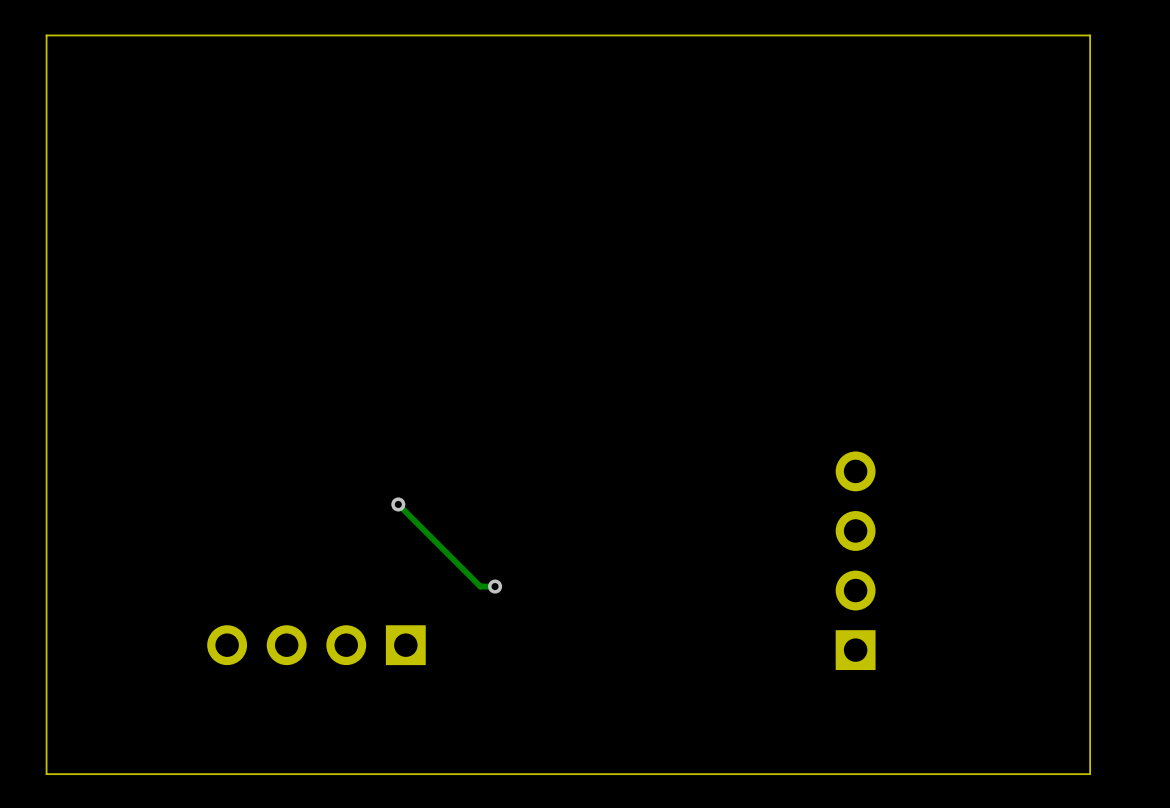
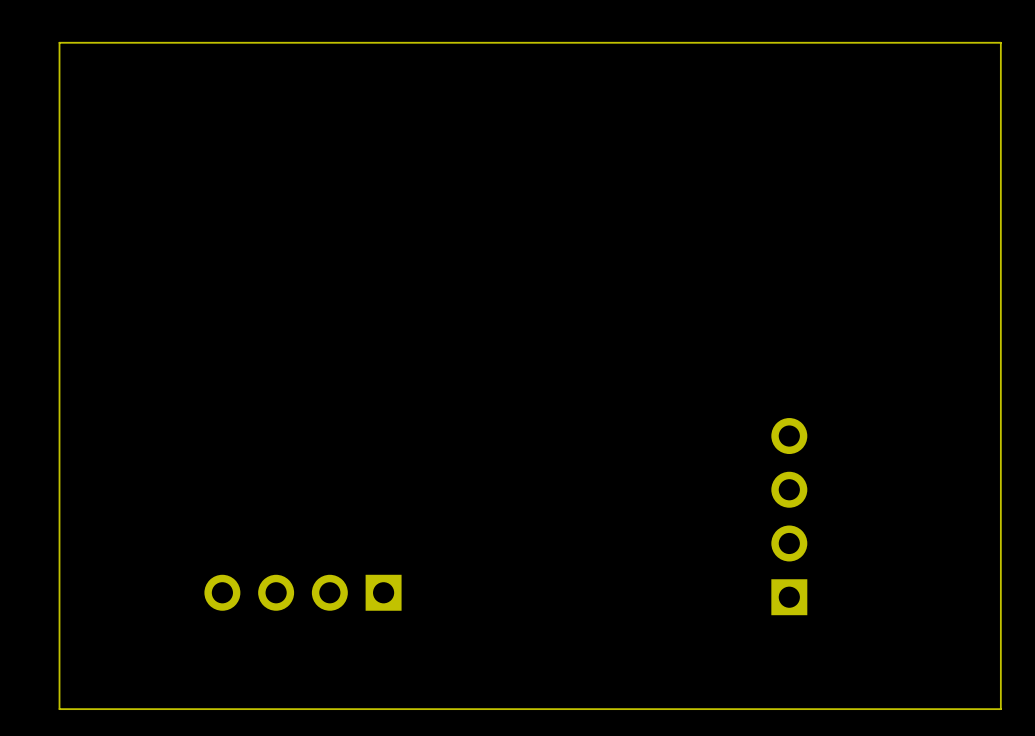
track: (398, 504) (480, 586) (495, 586) -> none
via: (398, 504) -> none
via: (495, 586) -> none

